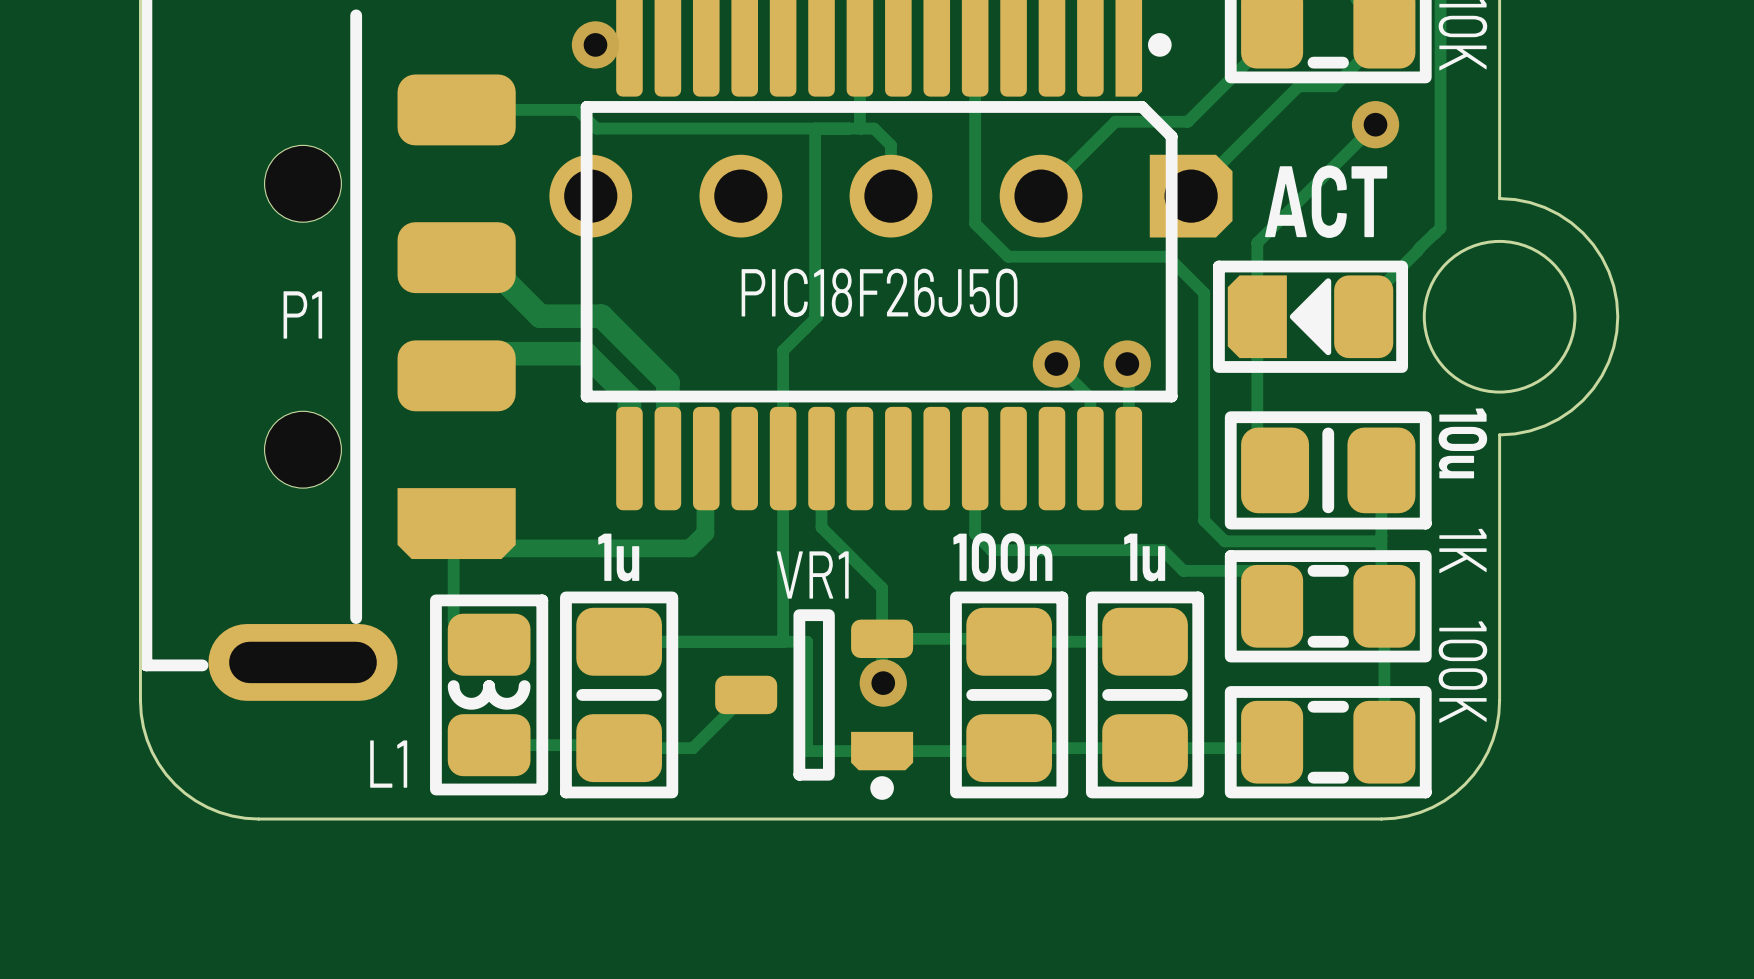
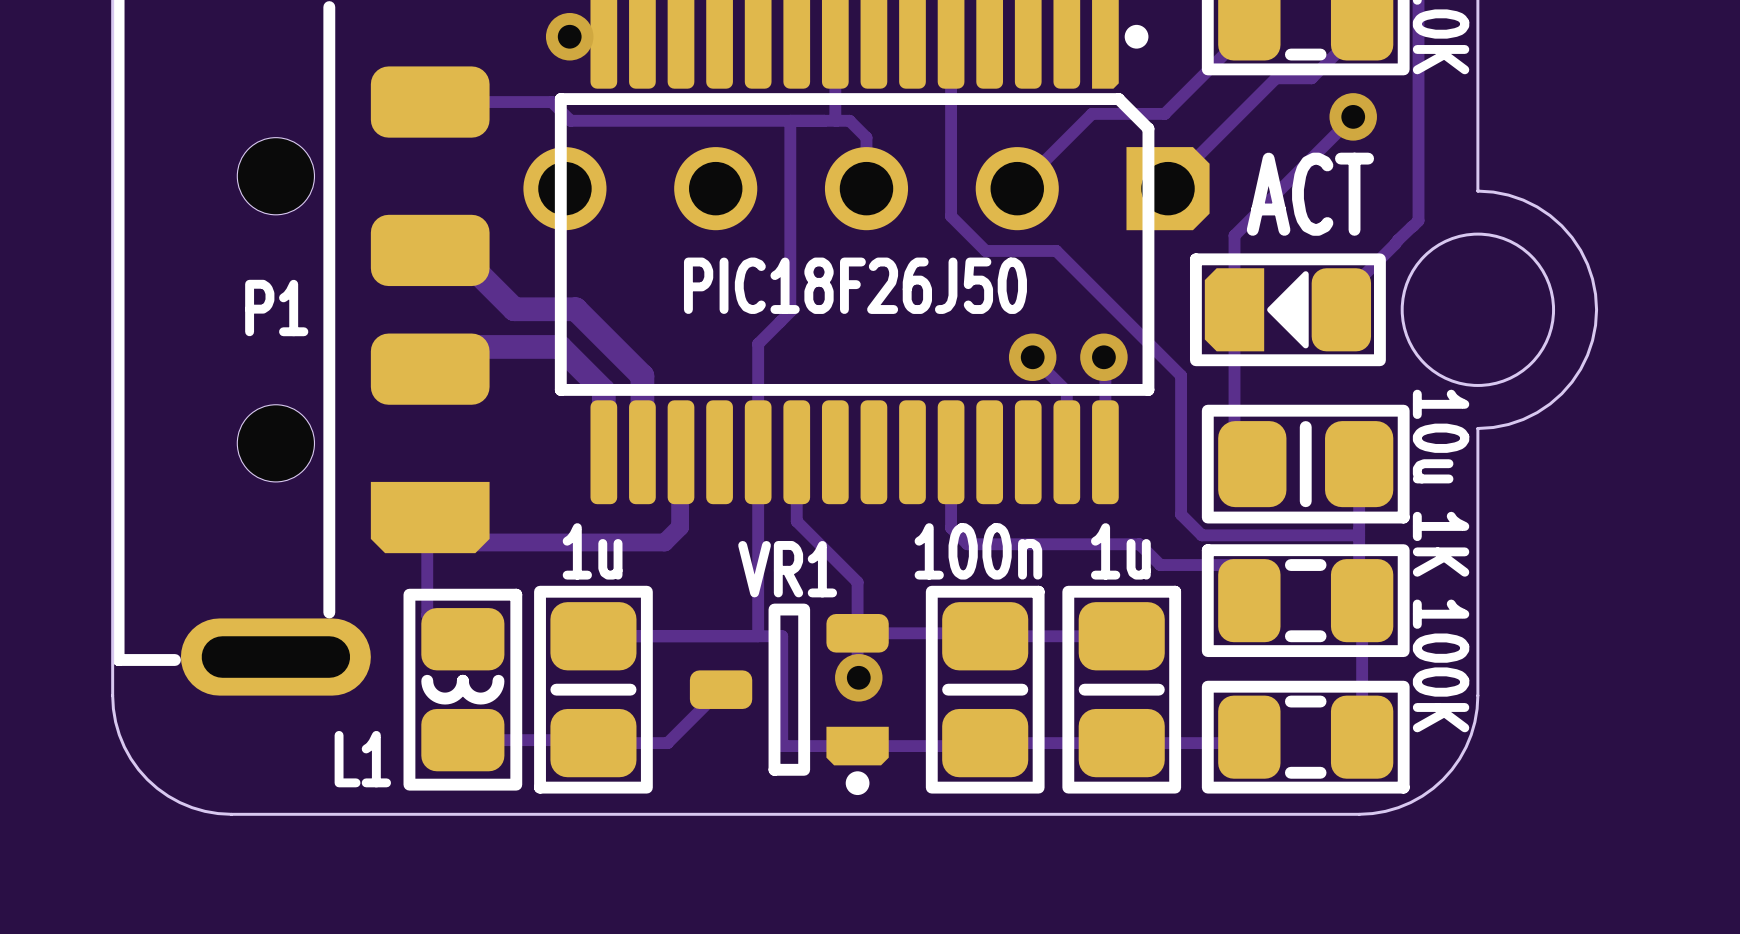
track: (1008, 256) (1167, 256) (1204, 293) (1204, 382) -> (984, 249) (1056, 250) (1181, 375)

